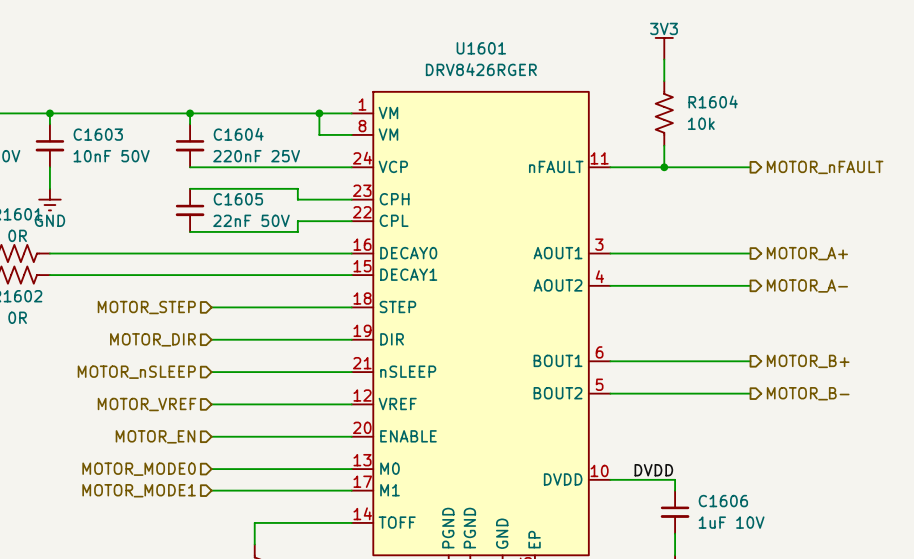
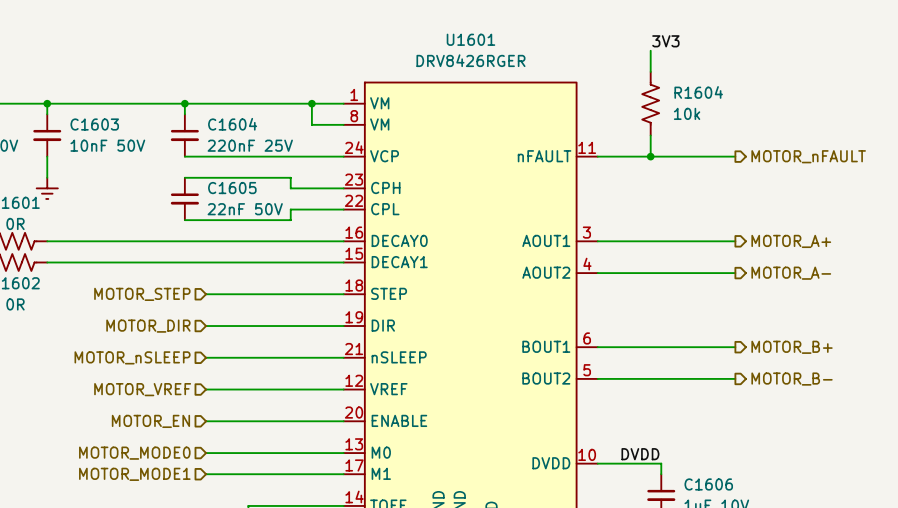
power symbol: 3V3 (664, 48) -> none
label: none -> 3V3 (665, 41)
power symbol text: GND (49, 220) -> none

